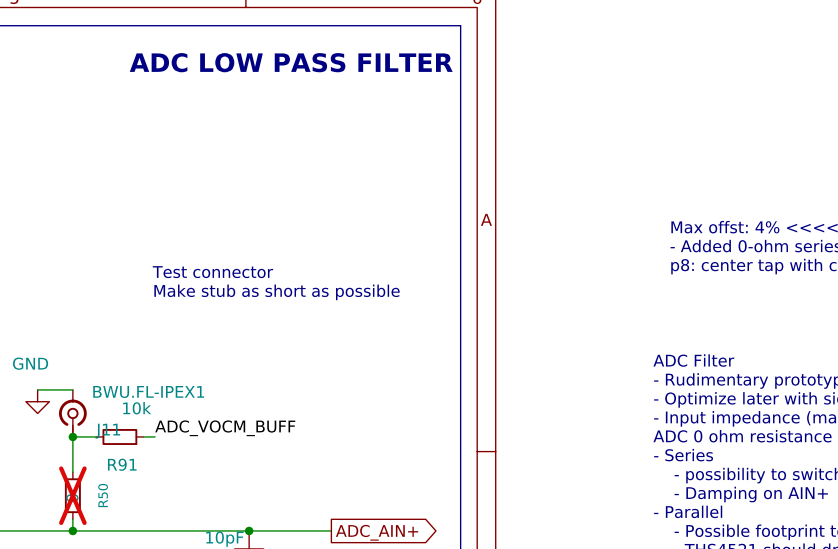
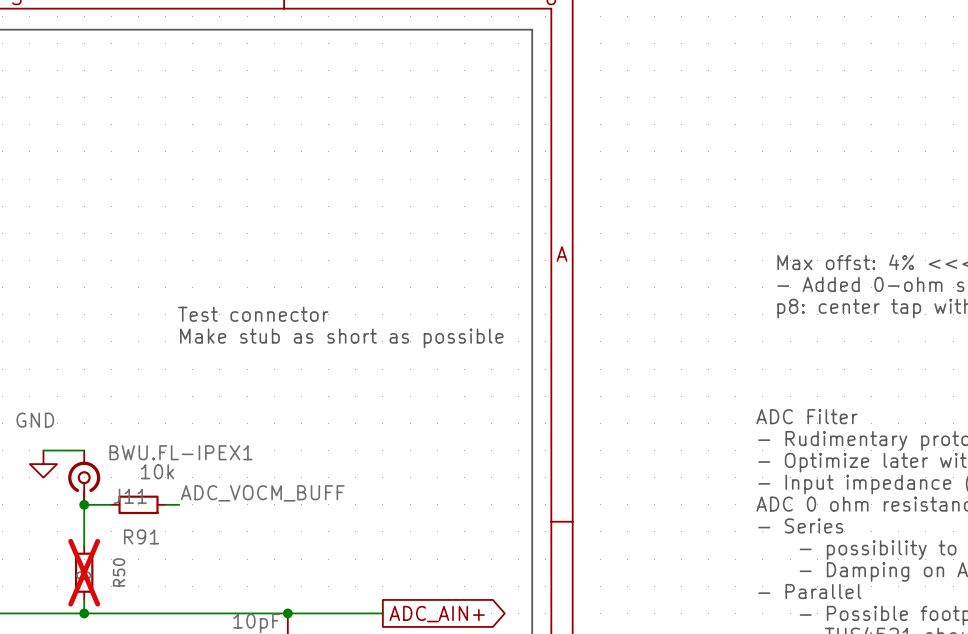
text: ADC LOW PASS FILTER (291, 62) -> none

